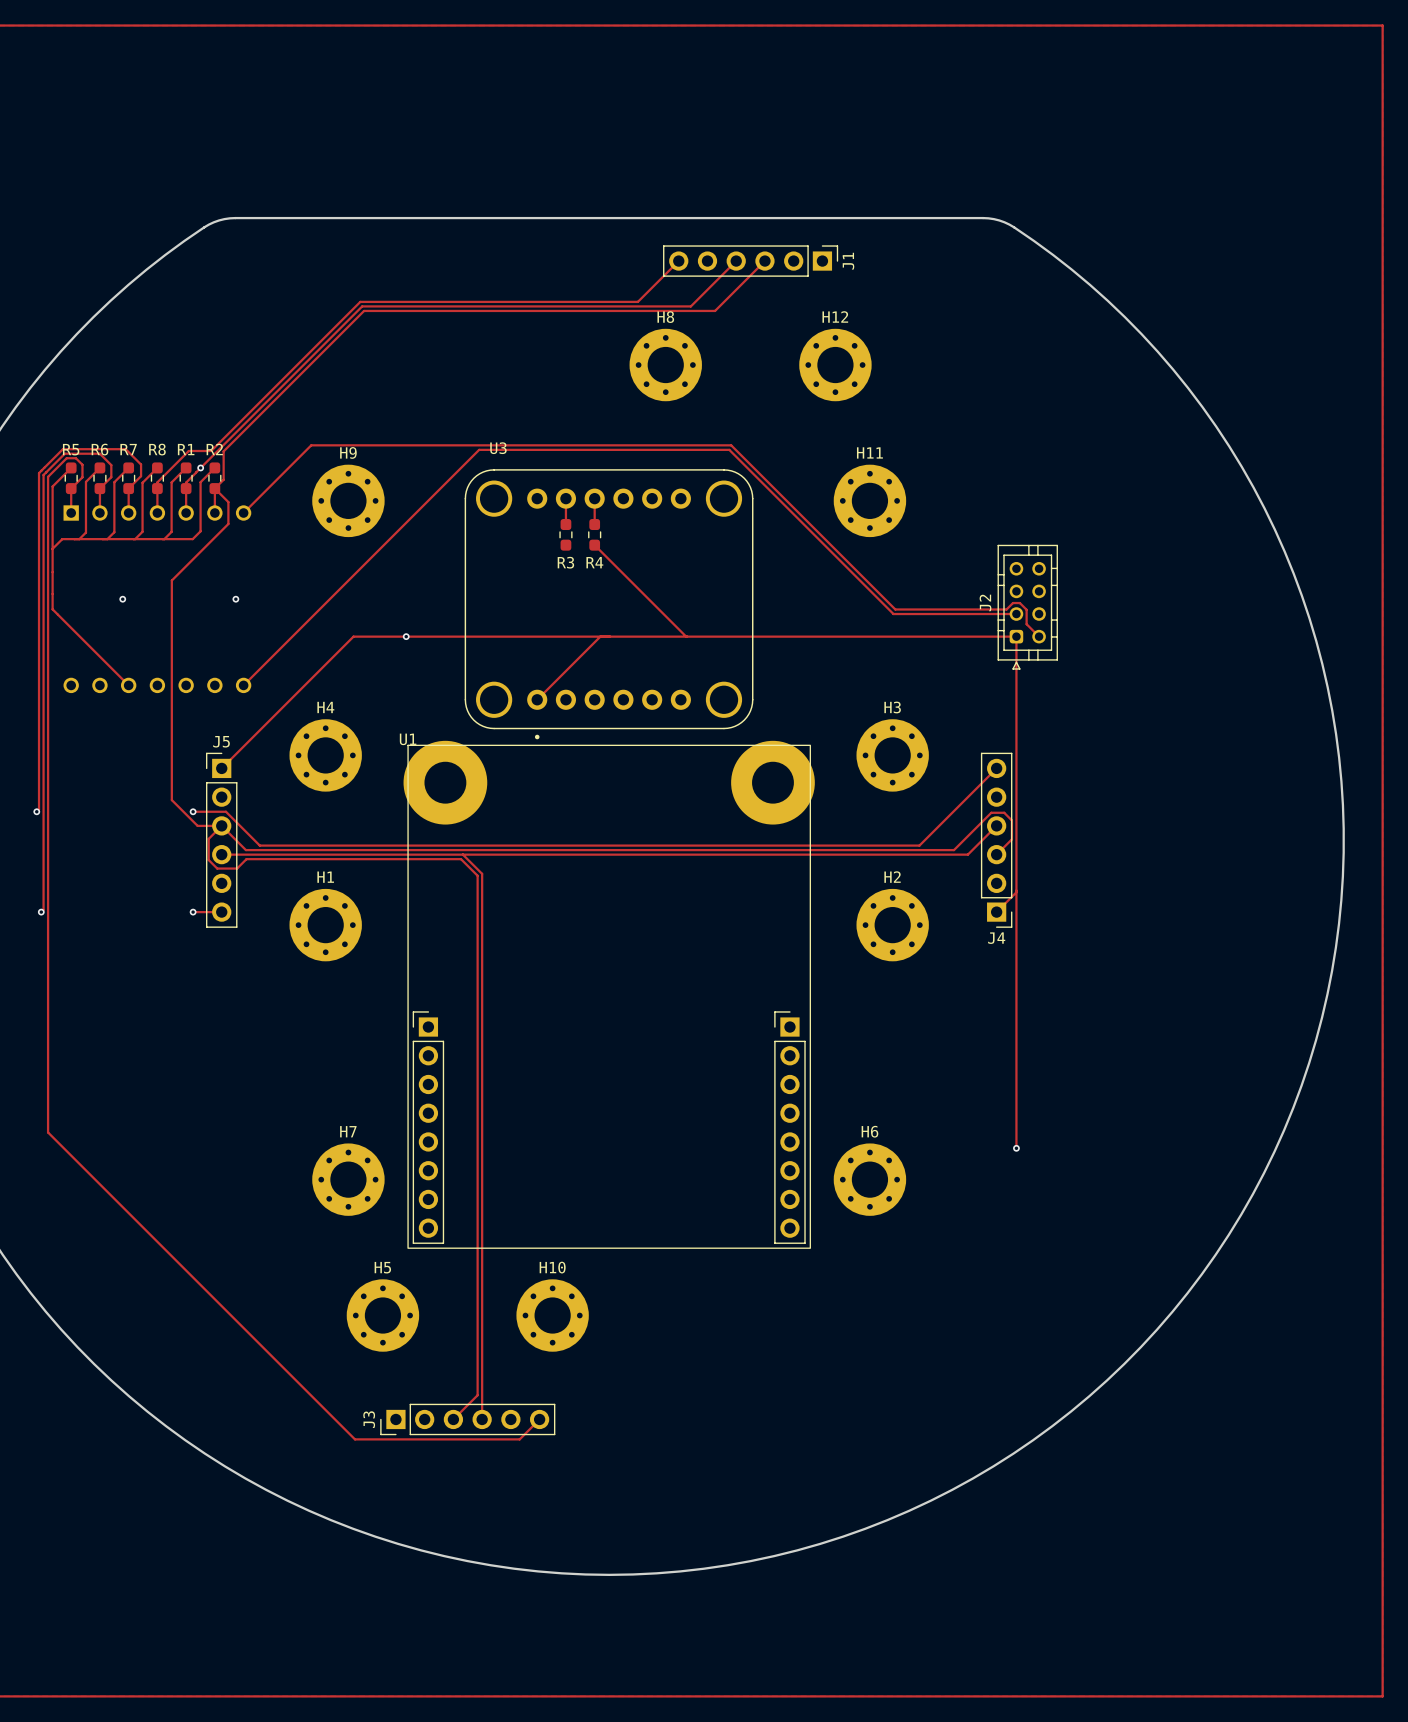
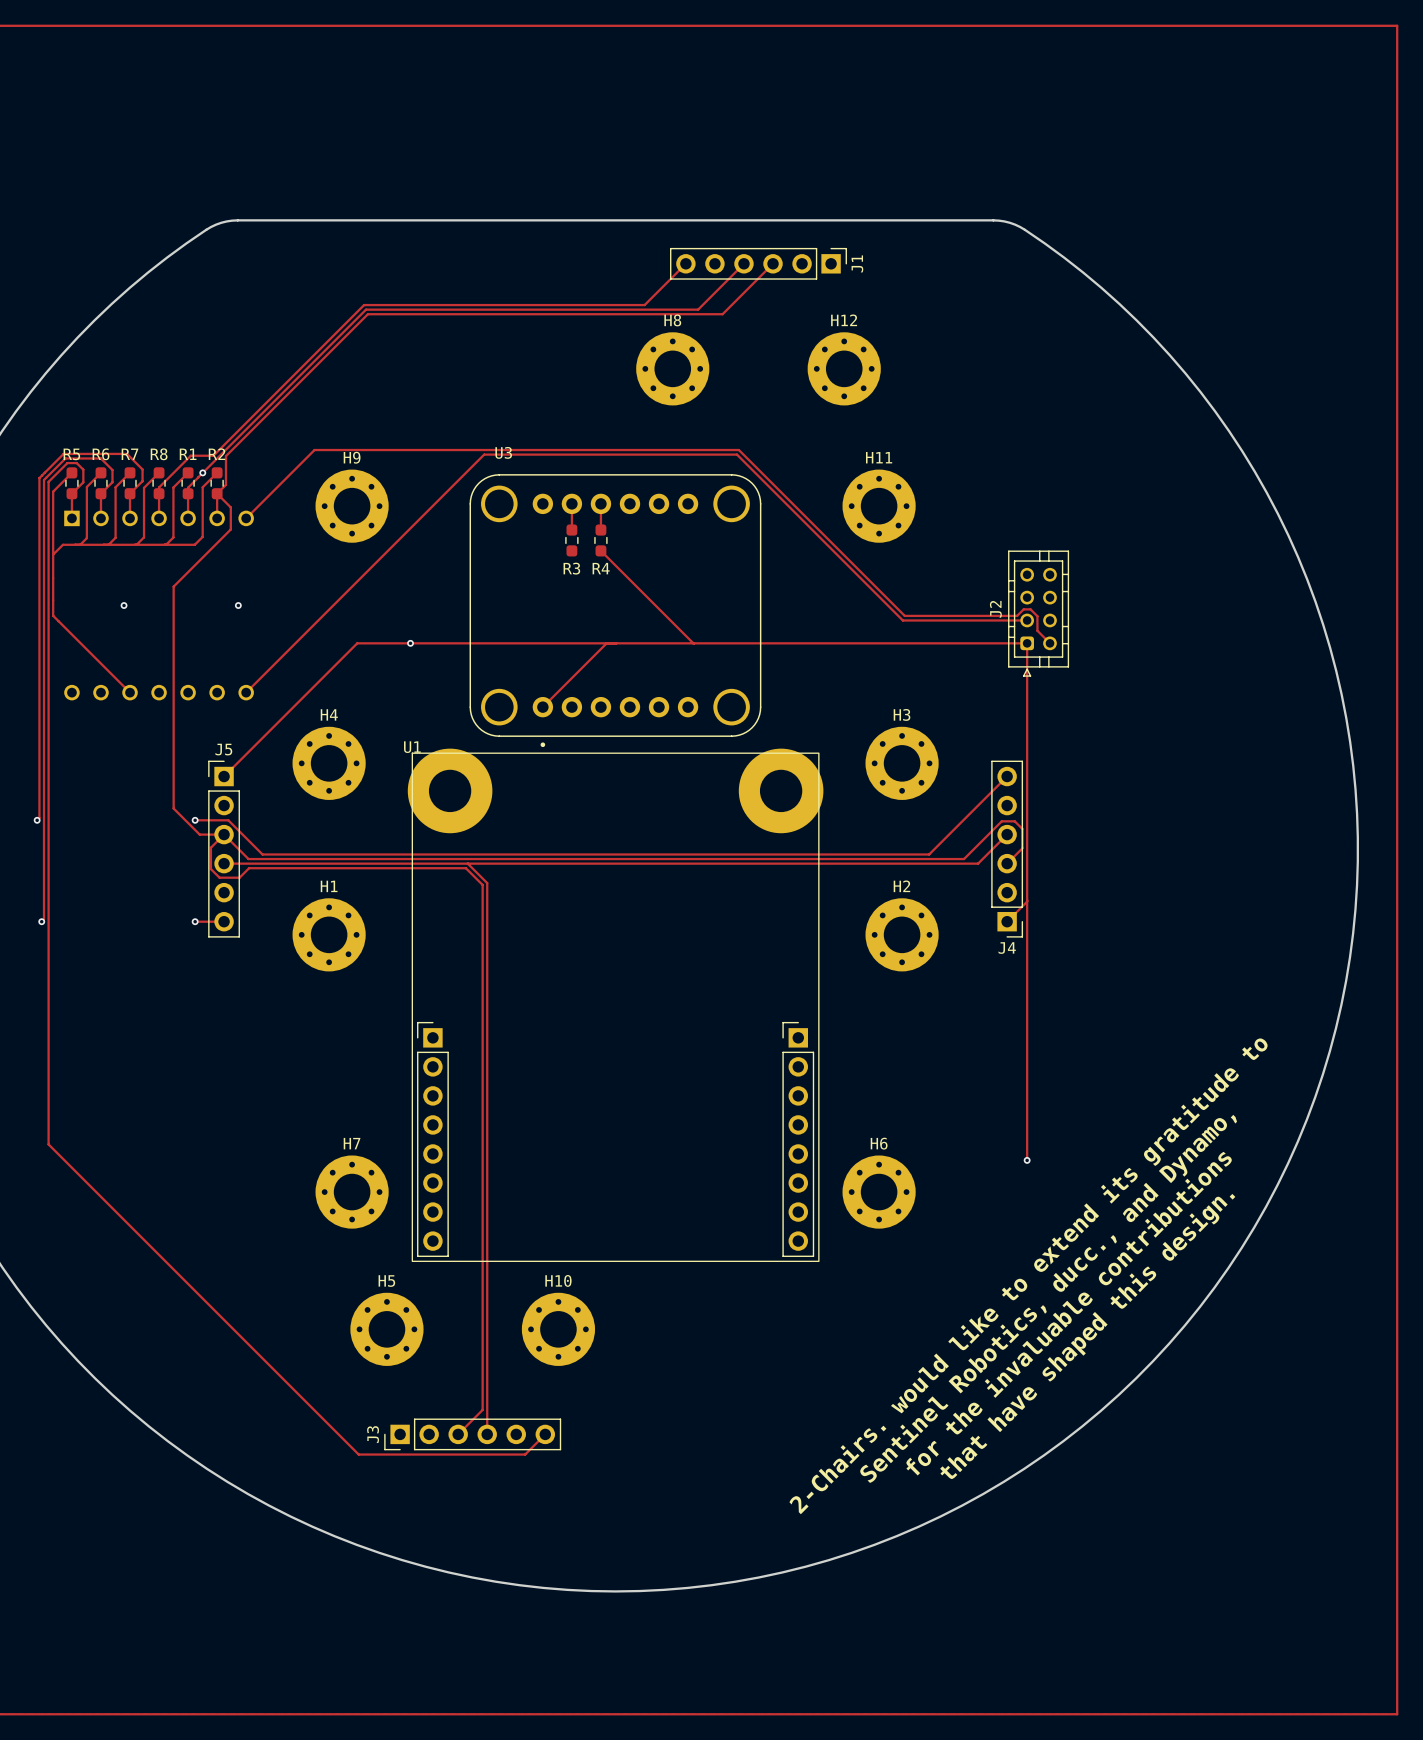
text: none -> 2-Chairs. would like to extend its gratitude to (1028, 1276)
text: none -> Sentinel Robotics, ducc., and Dynamo, (1048, 1298)
text: none -> for the invaluable contributions (1069, 1313)
text: none -> that have shaped this design. (1087, 1336)

